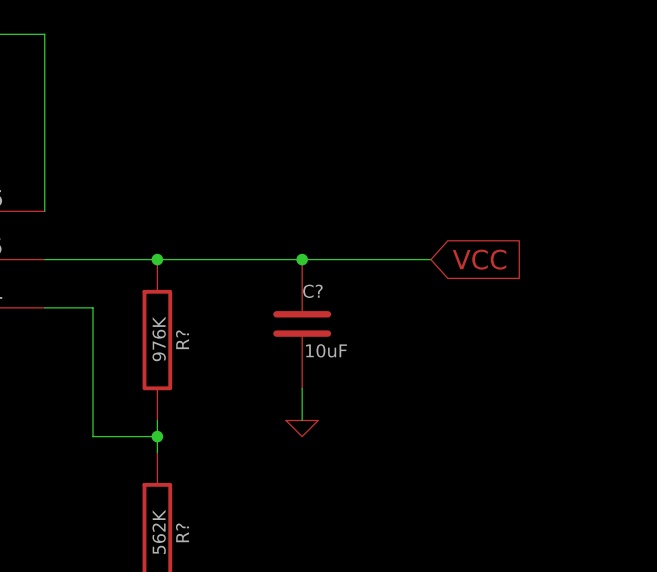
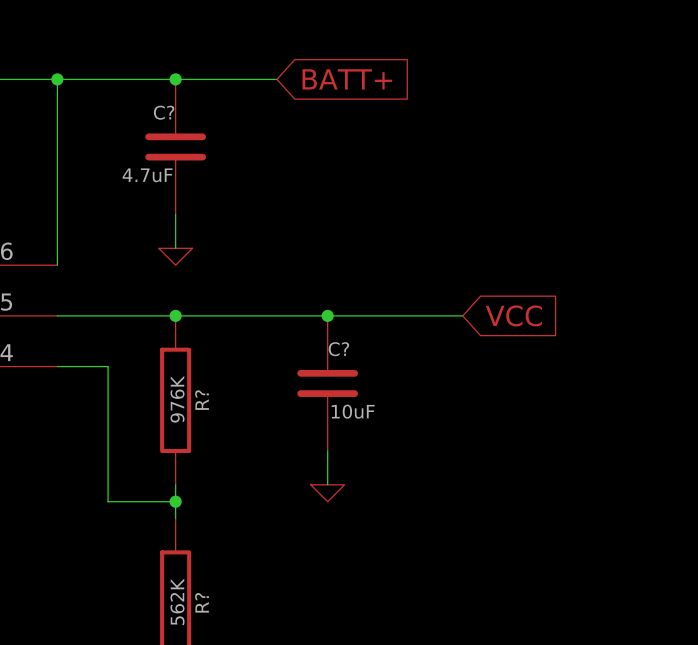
wire: none -> (57, 79) (276, 79)
junction: none -> (57, 79)
junction: none -> (175, 79)
global label: none -> BATT+ (347, 79)
C?: none -> 4.7uF (175, 146)
wire: none -> (175, 214) (175, 248)
power symbol: none -> (175, 256)

